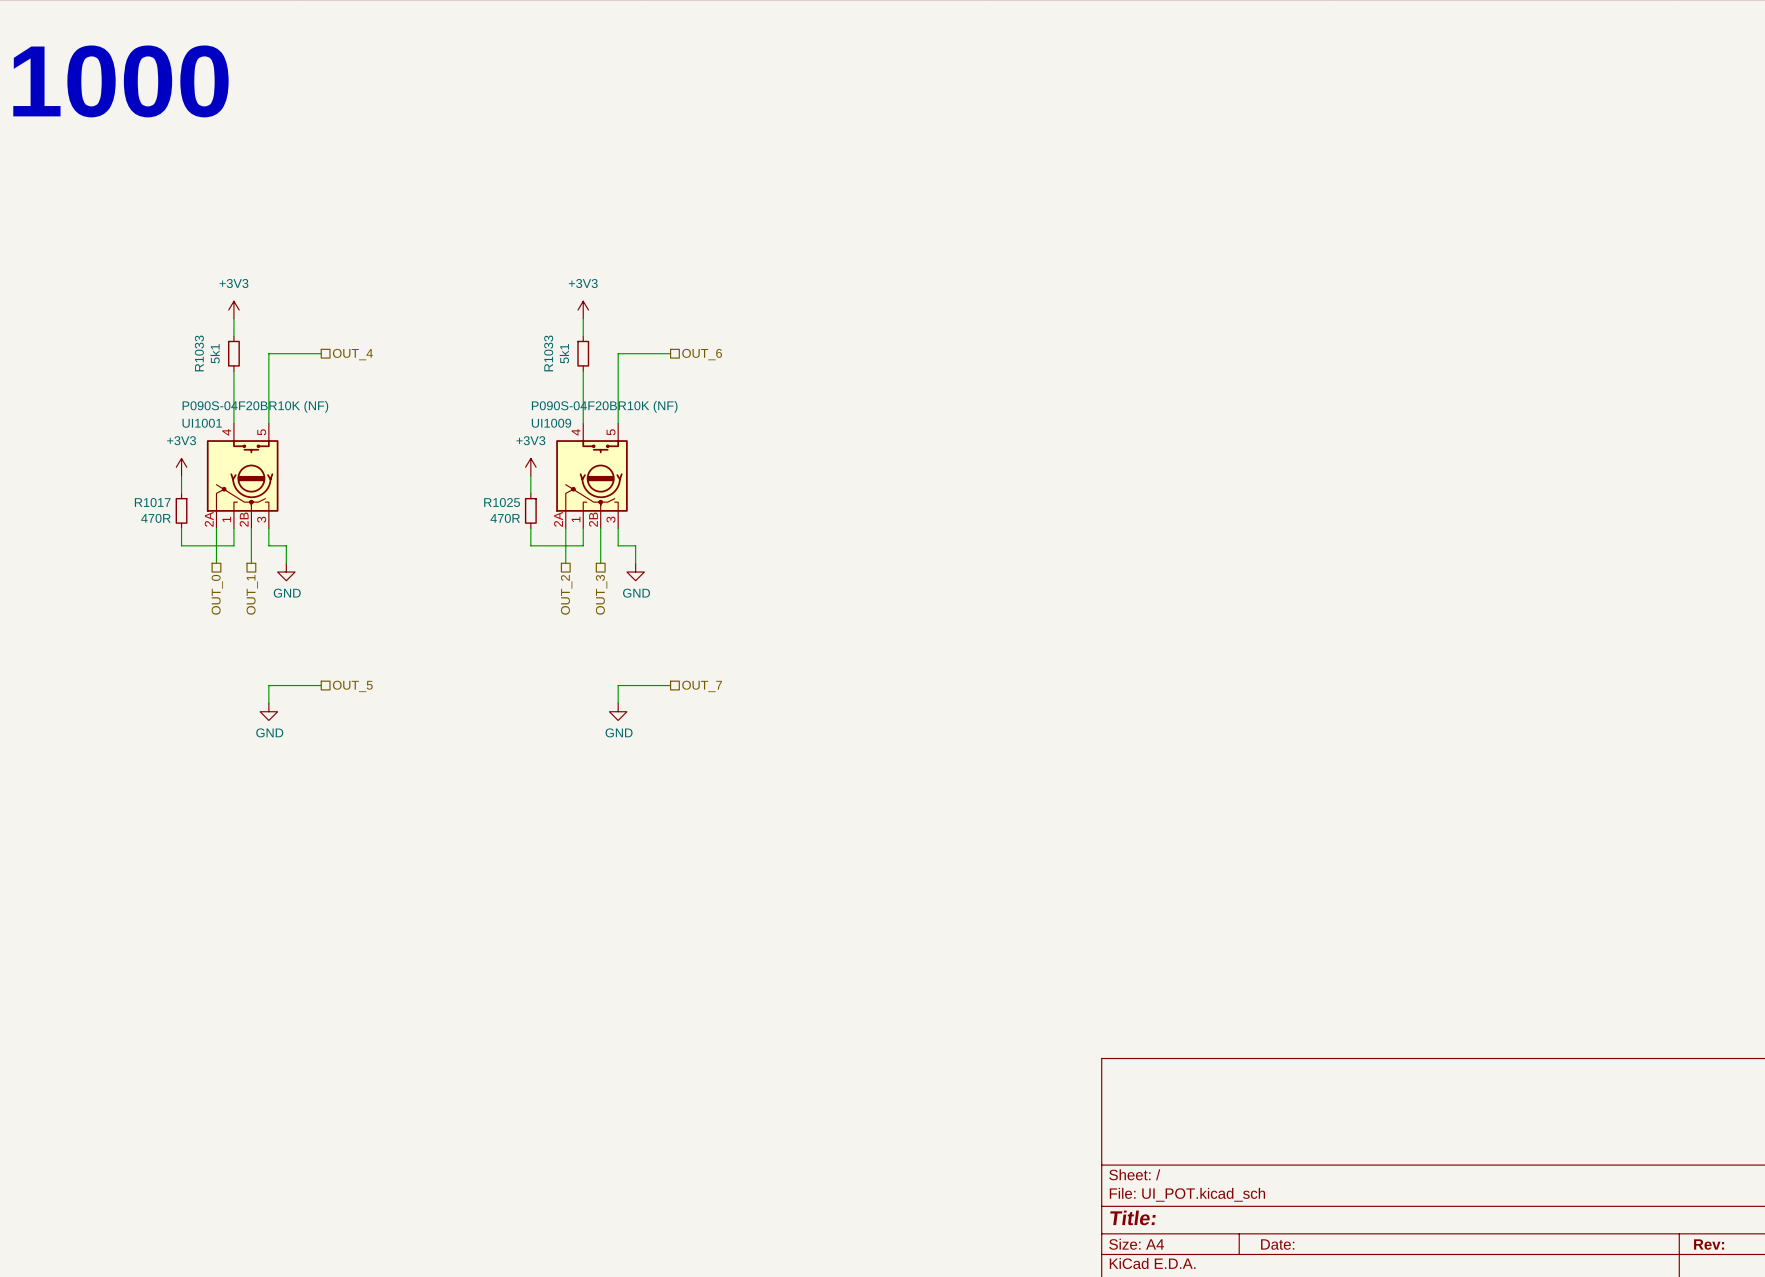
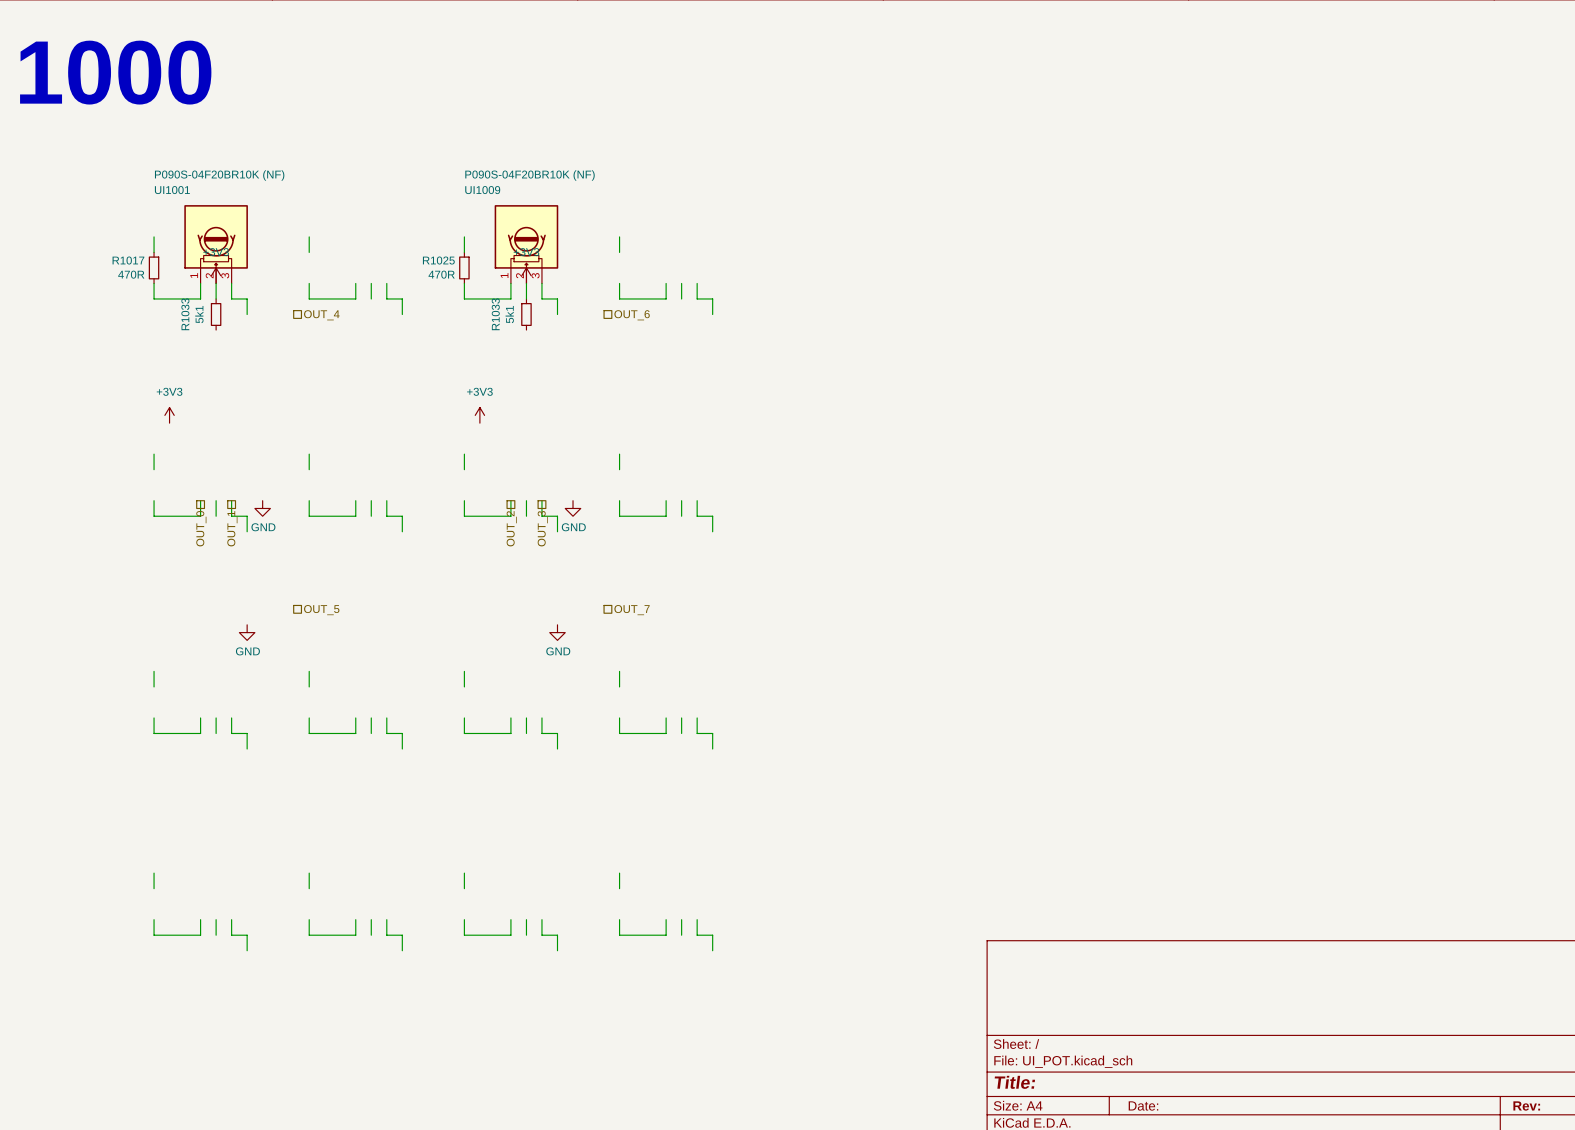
wire: none -> (154, 236) (154, 252)
wire: none -> (309, 236) (309, 252)
wire: none -> (464, 236) (464, 252)
wire: none -> (619, 236) (619, 252)
wire: none -> (154, 283) (154, 298) (200, 298) (200, 283)
wire: none -> (231, 283) (231, 298) (247, 298) (247, 314)
wire: none -> (309, 283) (309, 298) (355, 298) (355, 283)
wire: none -> (371, 283) (371, 298)
wire: none -> (386, 283) (386, 298) (402, 298) (402, 314)
wire: none -> (464, 283) (464, 298) (510, 298) (510, 283)
wire: none -> (541, 283) (541, 298) (557, 298) (557, 314)
wire: none -> (619, 283) (619, 298) (666, 298) (666, 283)
wire: none -> (681, 283) (681, 298)
wire: none -> (697, 283) (697, 298) (712, 298) (712, 314)
wire: (321, 353) (268, 353) (268, 423) -> none
wire: (670, 353) (618, 353) (618, 423) -> none
wire: (233, 371) (233, 423) -> none
wire: (583, 371) (583, 423) -> none
UI1001 symbol: [206, 423, 279, 529] -> [184, 205, 248, 284]
UI1009 symbol: [556, 423, 628, 529] -> [494, 205, 559, 284]
wire: (181, 475) (181, 493) -> (154, 454) (154, 469)
wire: (530, 475) (530, 493) -> (464, 454) (464, 469)
R1017 position: (181, 510) -> (154, 267)
wire: none -> (309, 454) (309, 469)
R1025 position: (530, 510) -> (464, 267)
wire: none -> (619, 454) (619, 469)
wire: (181, 528) (181, 545) (233, 545) (233, 528) -> (309, 500) (309, 516) (355, 516) (355, 500)
wire: (216, 528) (216, 563) -> (154, 500) (154, 516) (200, 516) (200, 500)
wire: (251, 528) (251, 563) -> (247, 531) (247, 516) (231, 516) (231, 500)
wire: (268, 528) (268, 545) (286, 545) (286, 563) -> (386, 500) (386, 516) (402, 516) (402, 531)
wire: (530, 528) (530, 545) (583, 545) (583, 528) -> (619, 500) (619, 516) (666, 516) (666, 500)
wire: (565, 528) (565, 563) -> (464, 500) (464, 516) (510, 516) (510, 500)
wire: (600, 528) (600, 563) -> (557, 531) (557, 516) (541, 516) (541, 500)
wire: (618, 528) (618, 545) (635, 545) (635, 563) -> (697, 500) (697, 516) (712, 516) (712, 531)
wire: none -> (216, 500) (216, 516)
wire: none -> (371, 500) (371, 516)
wire: none -> (526, 500) (526, 516)
wire: none -> (681, 500) (681, 516)
wire: (321, 685) (268, 685) (268, 703) -> none
wire: (670, 685) (618, 685) (618, 703) -> none
wire: none -> (154, 671) (154, 686)
wire: none -> (309, 671) (309, 686)
wire: none -> (464, 671) (464, 686)
wire: none -> (619, 671) (619, 686)
wire: none -> (154, 717) (154, 733) (200, 733) (200, 717)
wire: none -> (216, 717) (216, 733)
wire: none -> (231, 717) (231, 733) (247, 733) (247, 748)
wire: none -> (309, 717) (309, 733) (355, 733) (355, 717)
wire: none -> (371, 717) (371, 733)
wire: none -> (386, 717) (386, 733) (402, 733) (402, 748)
wire: none -> (464, 717) (464, 733) (510, 733) (510, 717)
wire: none -> (526, 717) (526, 733)
wire: none -> (541, 717) (541, 733) (557, 733) (557, 748)
wire: none -> (619, 717) (619, 733) (666, 733) (666, 717)
wire: none -> (681, 717) (681, 733)
wire: none -> (697, 717) (697, 733) (712, 733) (712, 748)
wire: none -> (154, 873) (154, 888)
wire: none -> (309, 873) (309, 888)
wire: none -> (464, 873) (464, 888)
wire: none -> (619, 873) (619, 888)
wire: none -> (154, 919) (154, 935) (200, 935) (200, 919)
wire: none -> (216, 919) (216, 935)
wire: none -> (231, 919) (231, 935) (247, 935) (247, 950)
wire: none -> (309, 919) (309, 935) (355, 935) (355, 919)
wire: none -> (371, 919) (371, 935)
wire: none -> (386, 919) (386, 935) (402, 935) (402, 950)
wire: none -> (464, 919) (464, 935) (510, 935) (510, 919)
wire: none -> (526, 919) (526, 935)
wire: none -> (541, 919) (541, 935) (557, 935) (557, 950)
wire: none -> (619, 919) (619, 935) (666, 935) (666, 919)
wire: none -> (681, 919) (681, 935)
wire: none -> (697, 919) (697, 935) (712, 935) (712, 950)

